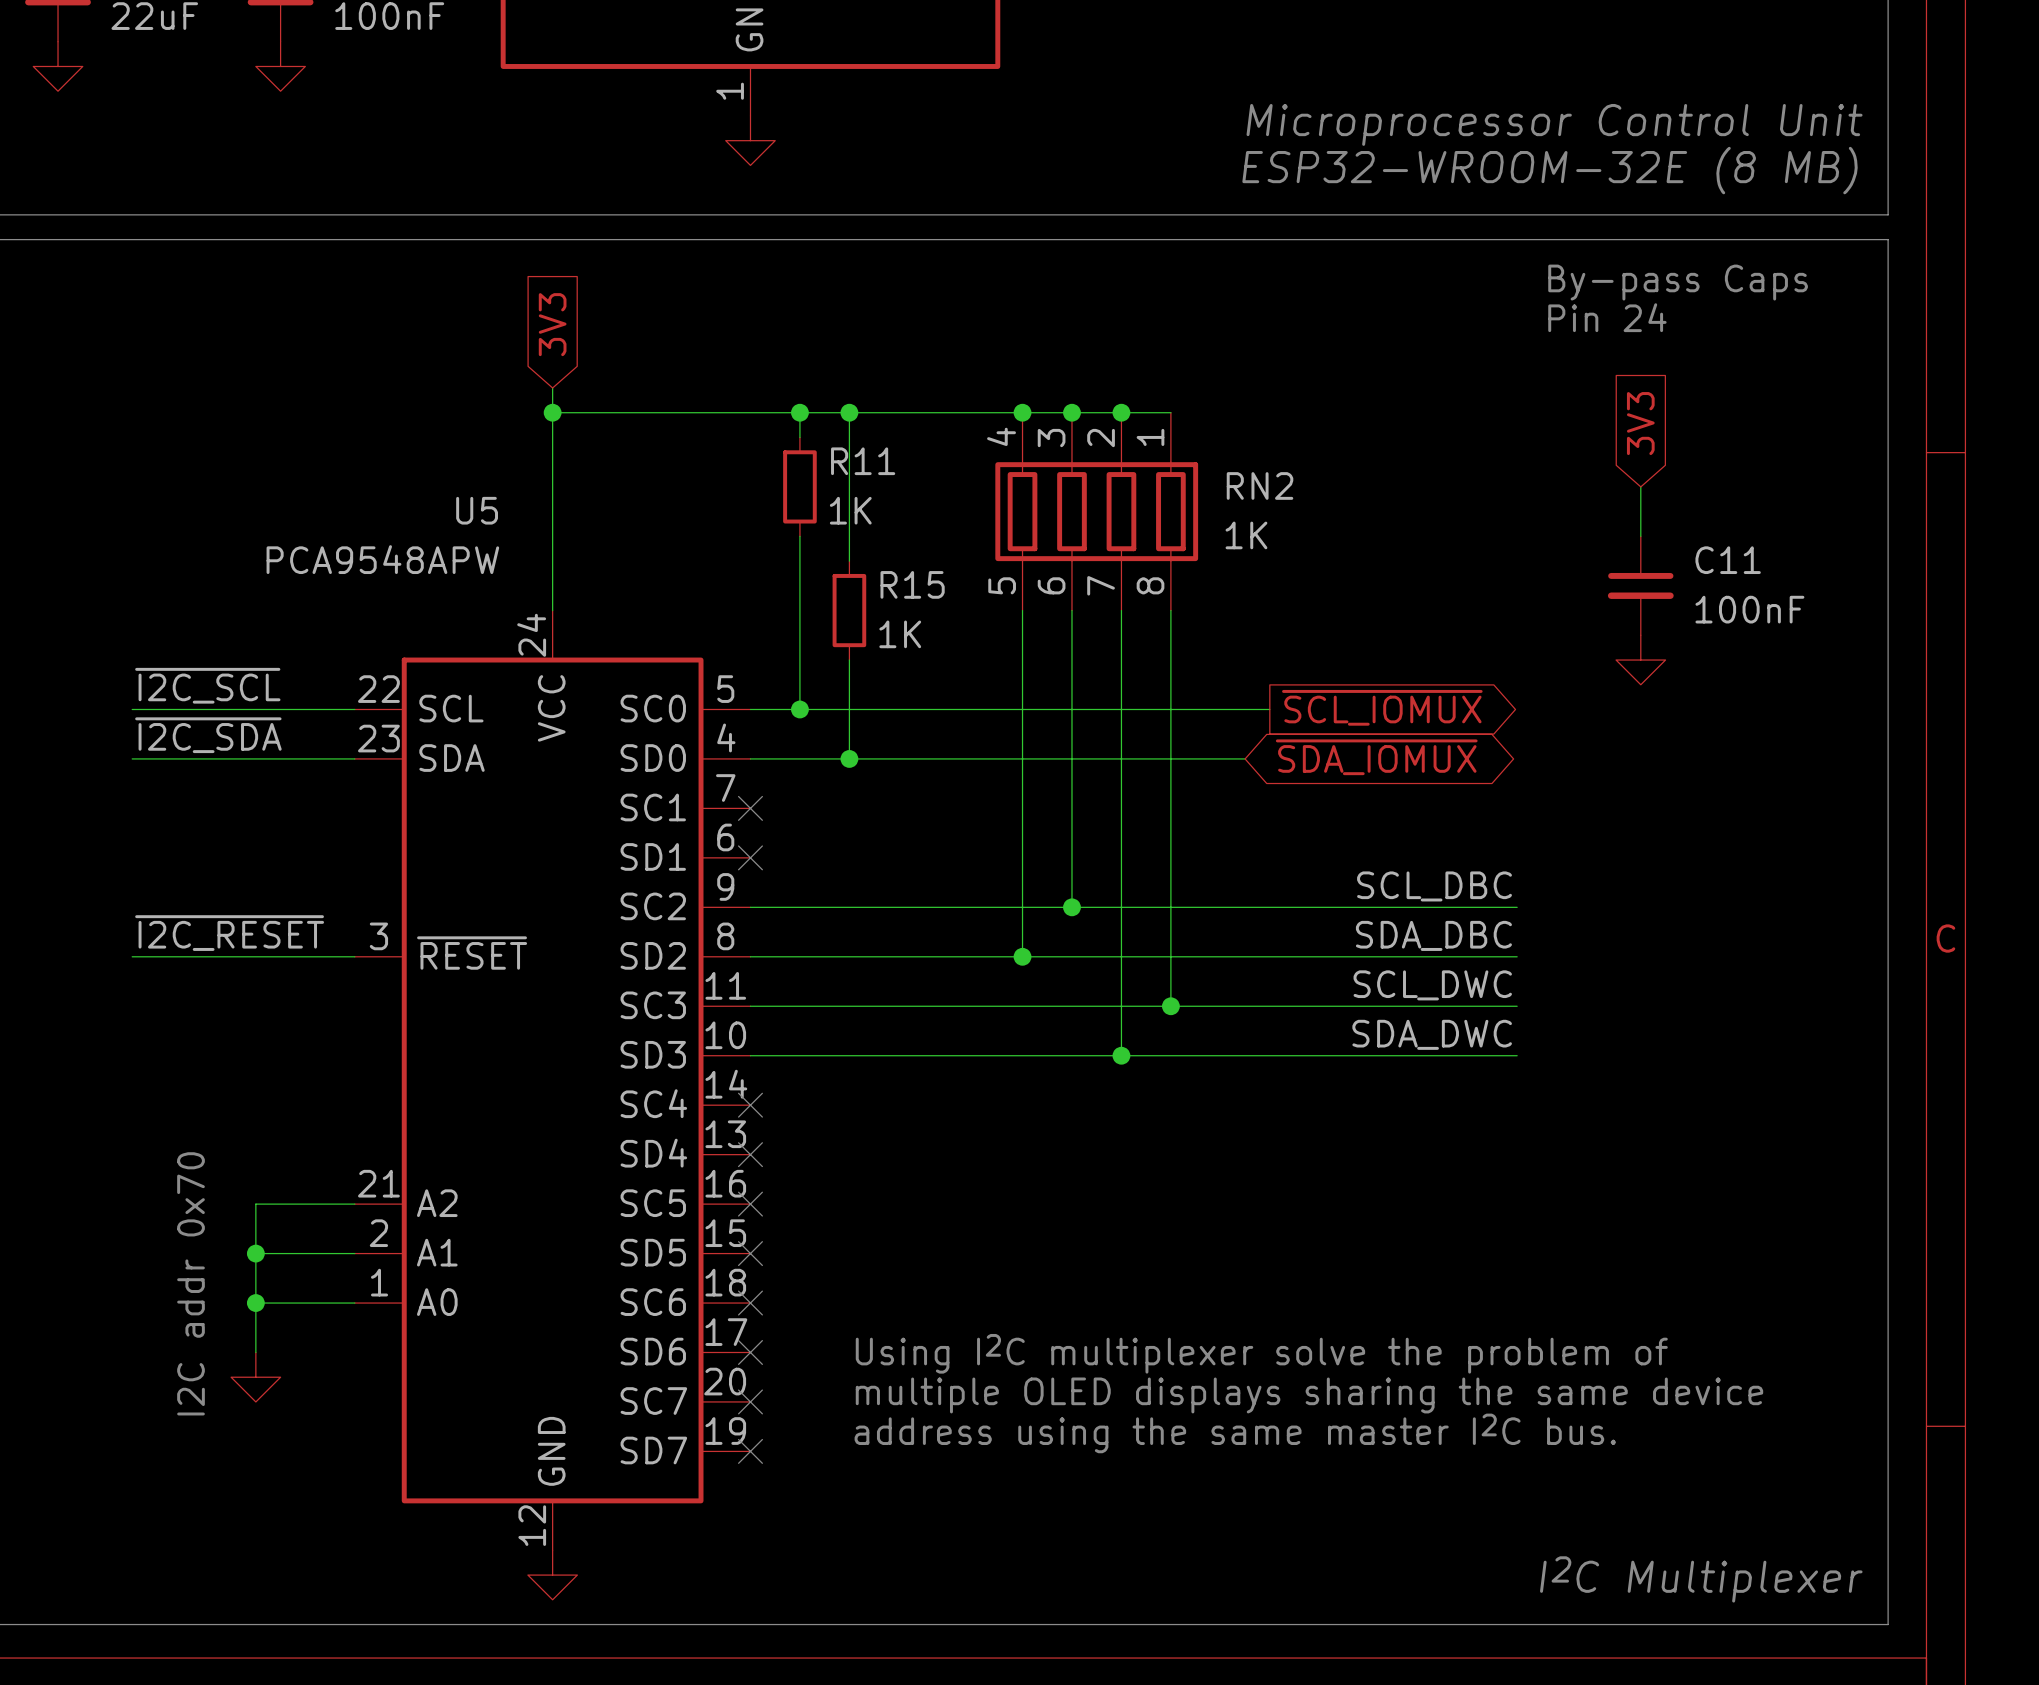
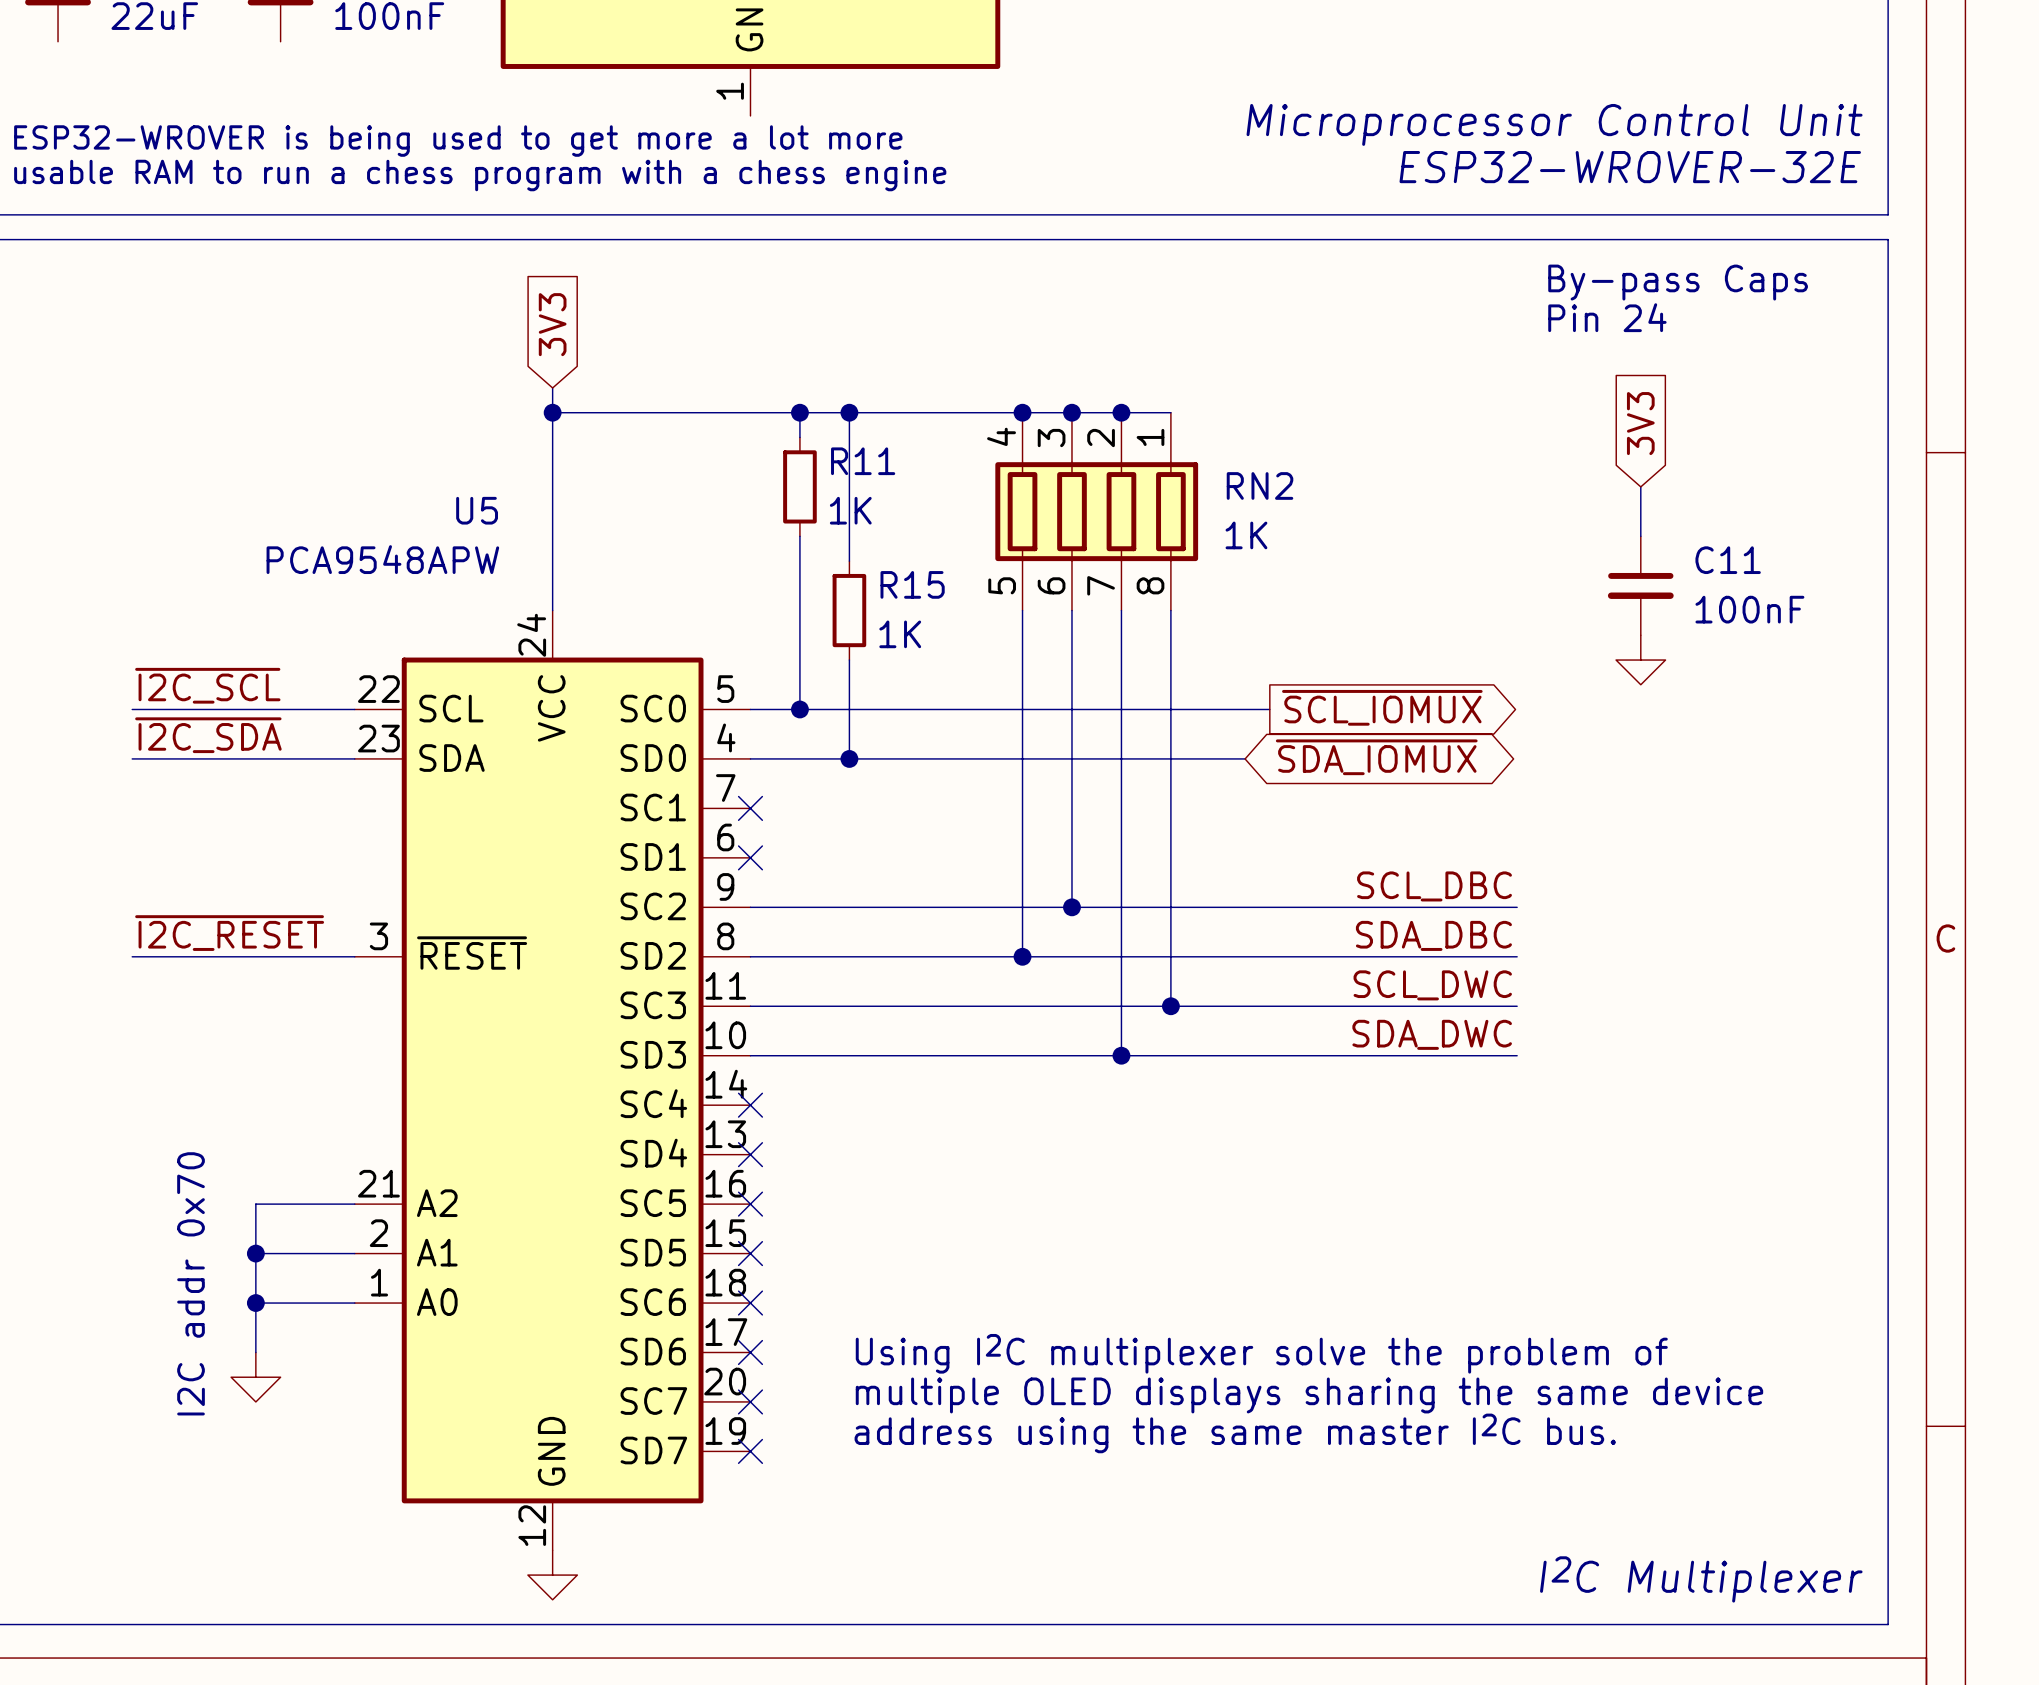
power symbol: (58, 66) -> none
power symbol: (280, 66) -> none
power symbol: (750, 140) -> none
text: none -> ESP32-WROVER is being used to get more a lot more (458, 141)
text: ESP32-WROOM-32E (8 MB) (1550, 170) -> ESP32-WROVER-32E (1630, 167)
text: none -> usable RAM to run a chess program with a chess engine (480, 175)

